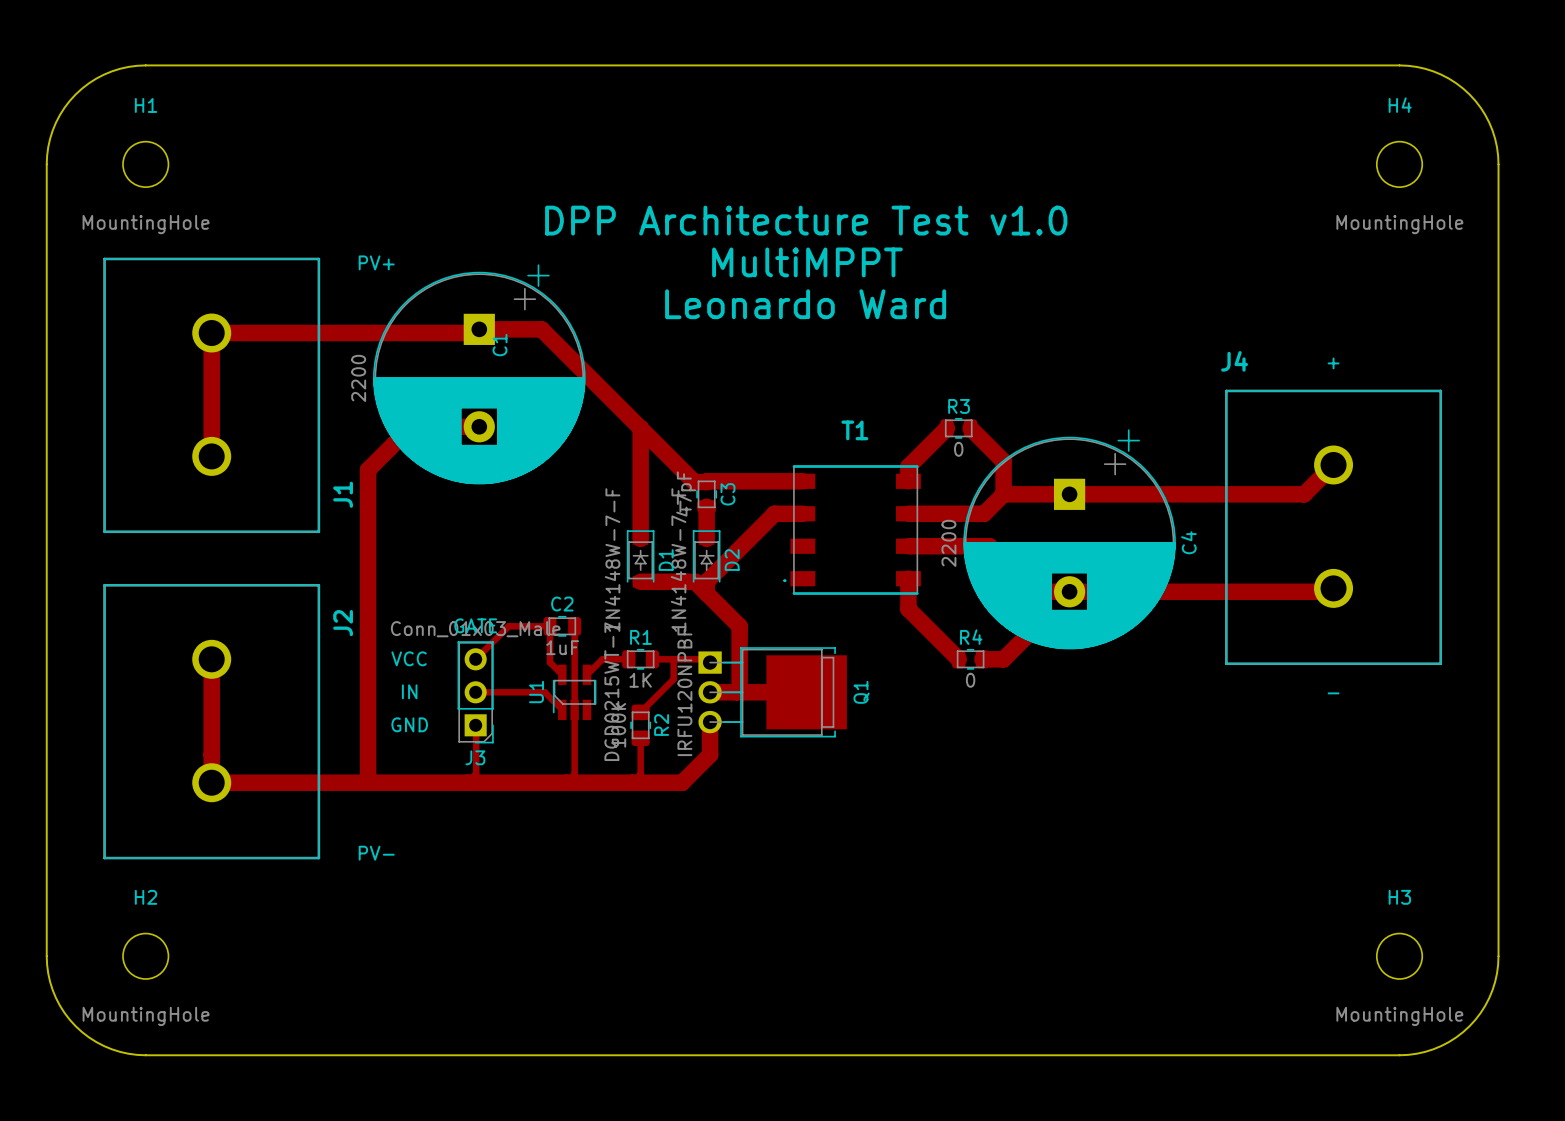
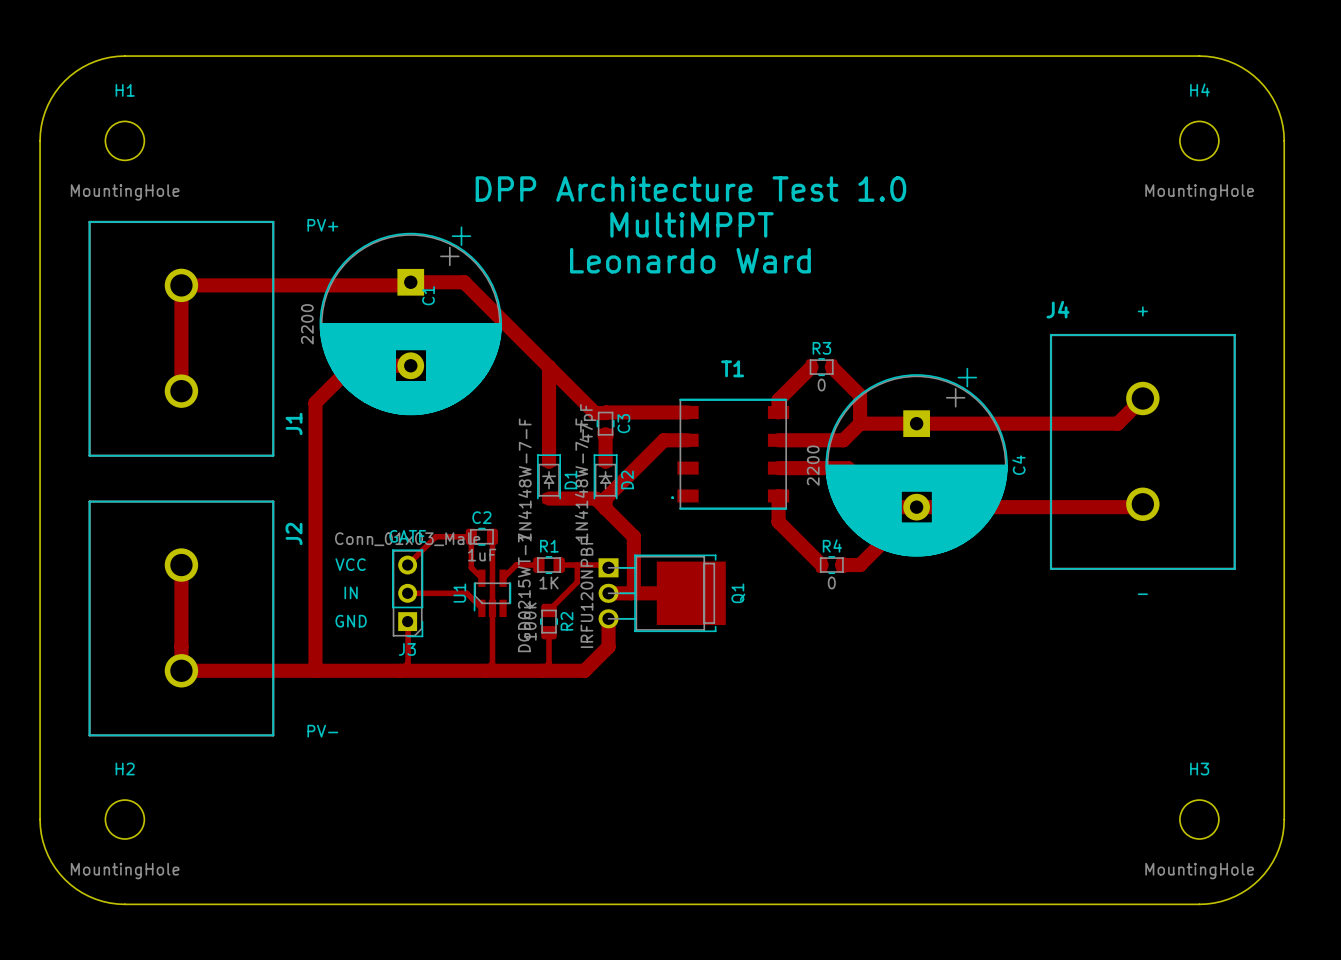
text: DPP Architecture Test v1.0 (806, 220) -> DPP Architecture Test 1.0 (690, 189)

